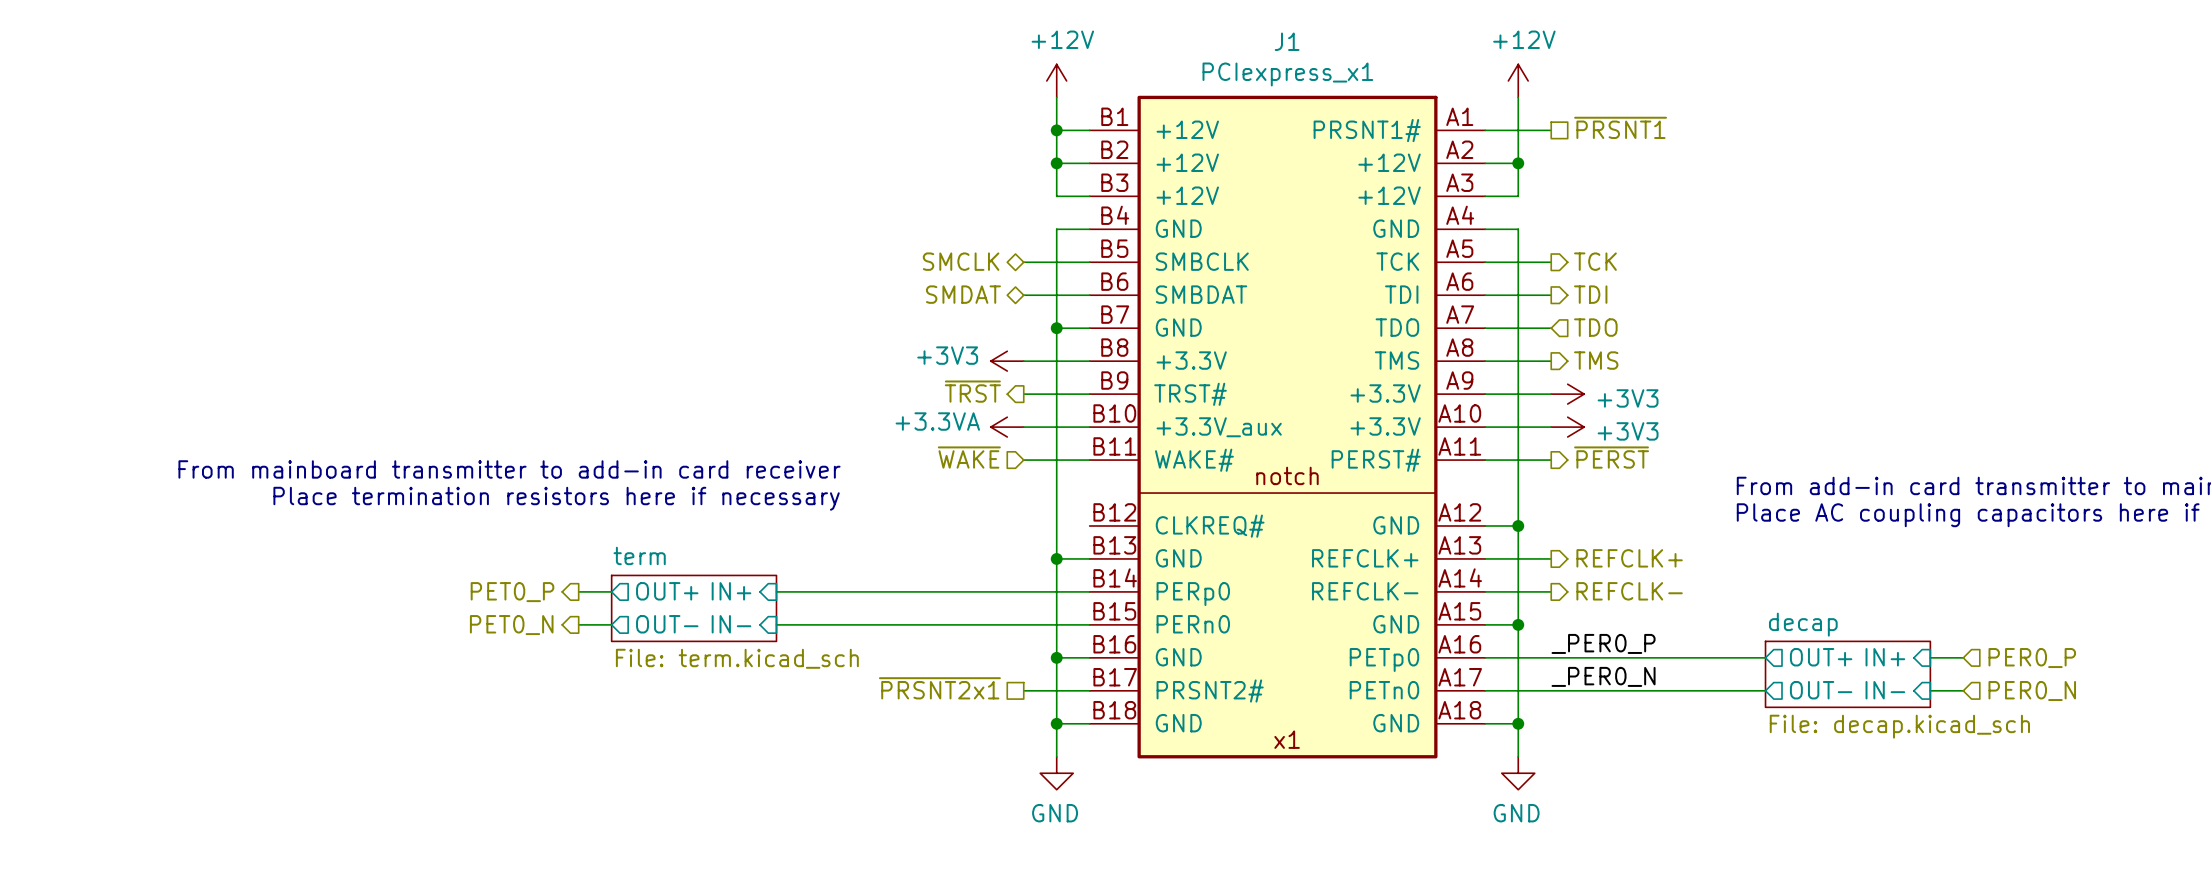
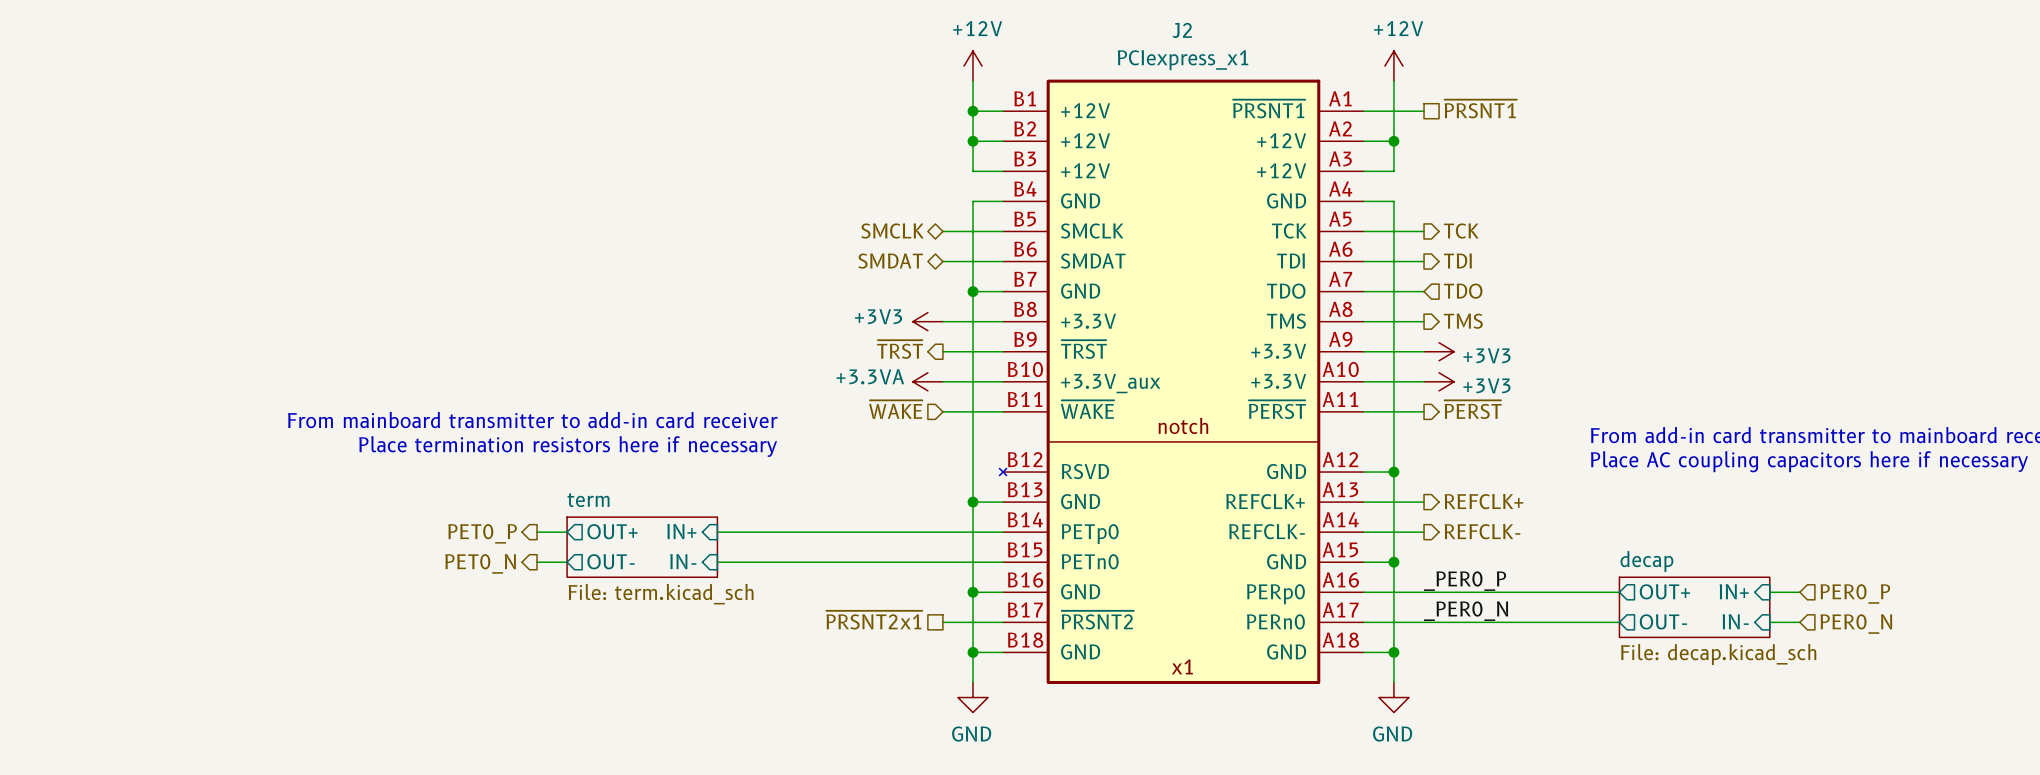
J2: none -> PCIexpress_x1 (1181, 381)
J1: PCIexpress_x1 (1287, 427) -> none

